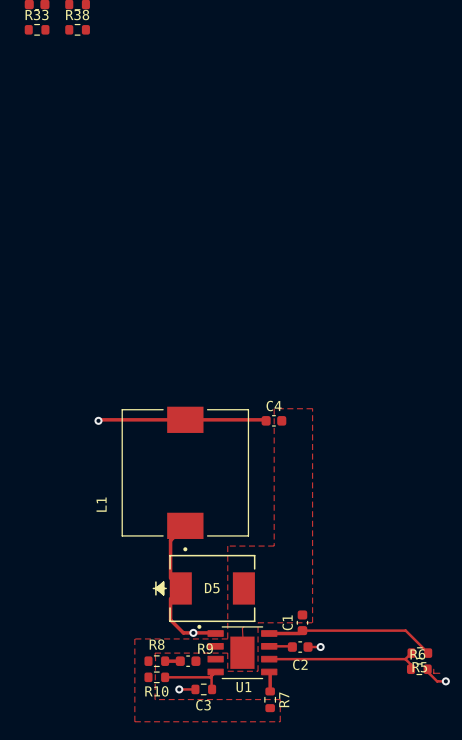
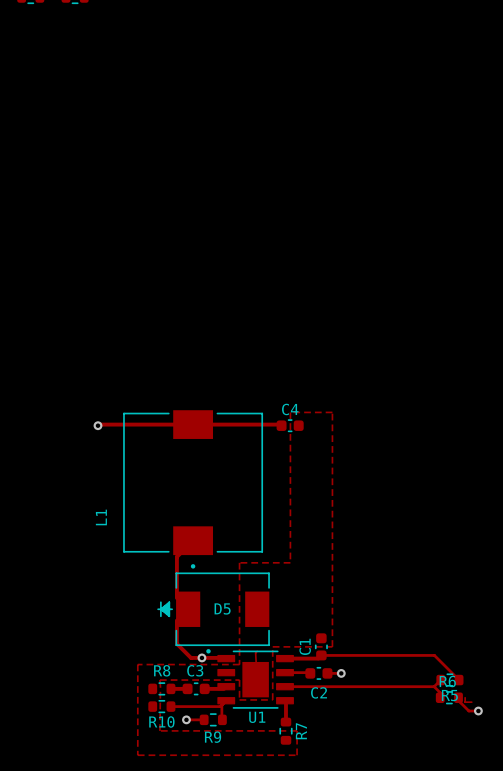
R9 name position: R9 (205, 648) -> R9 (213, 737)
track: none -> (226, 686) (224, 688) (204, 688)
C3 name position: C3 (203, 705) -> C3 (195, 670)

